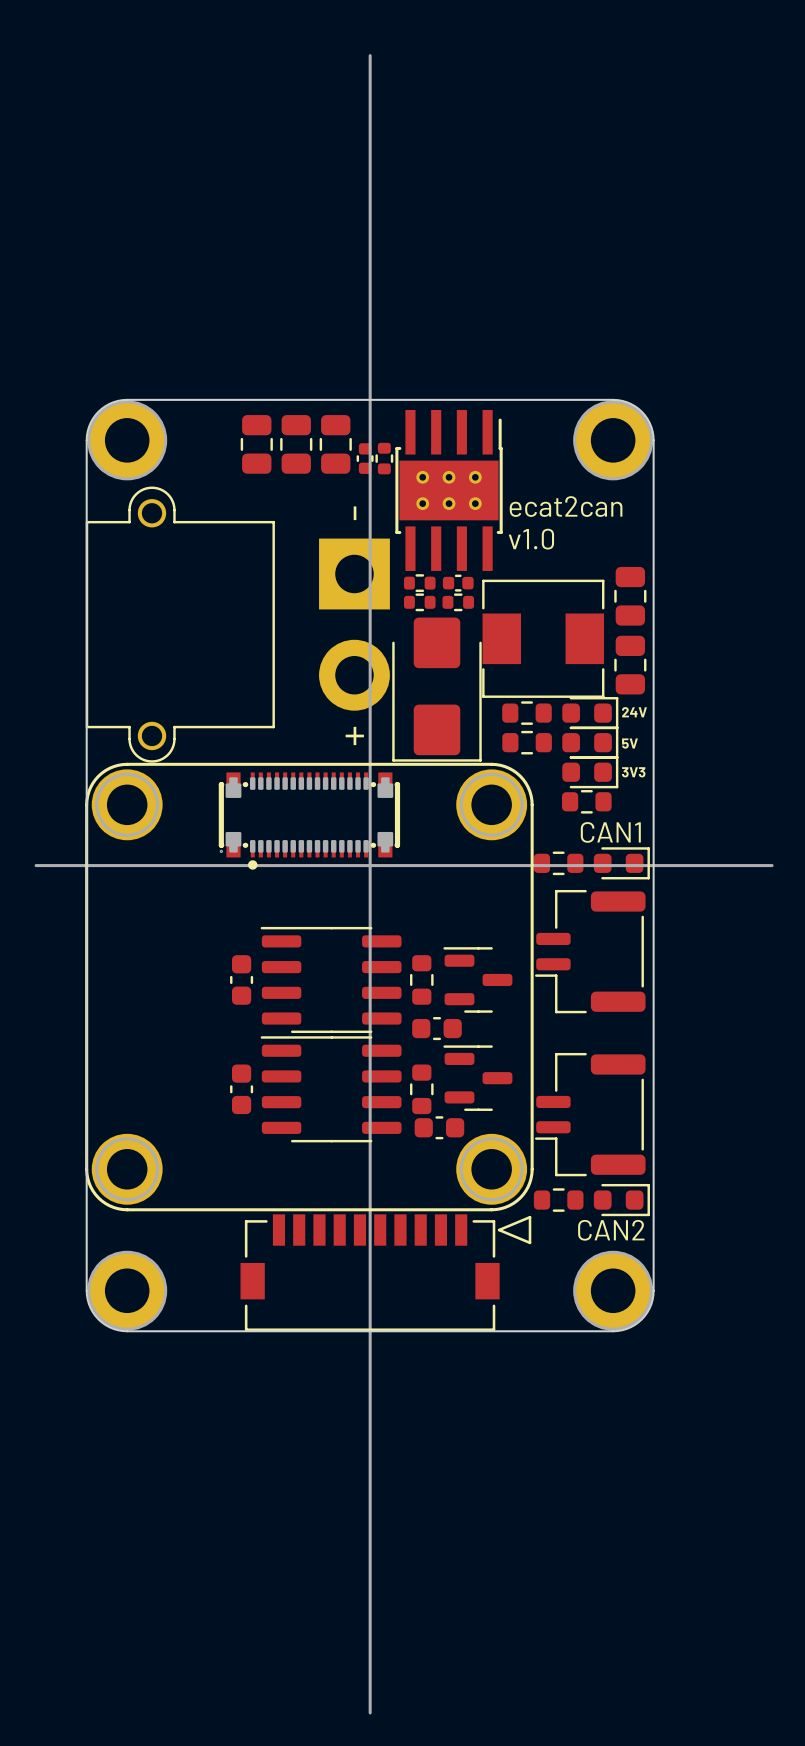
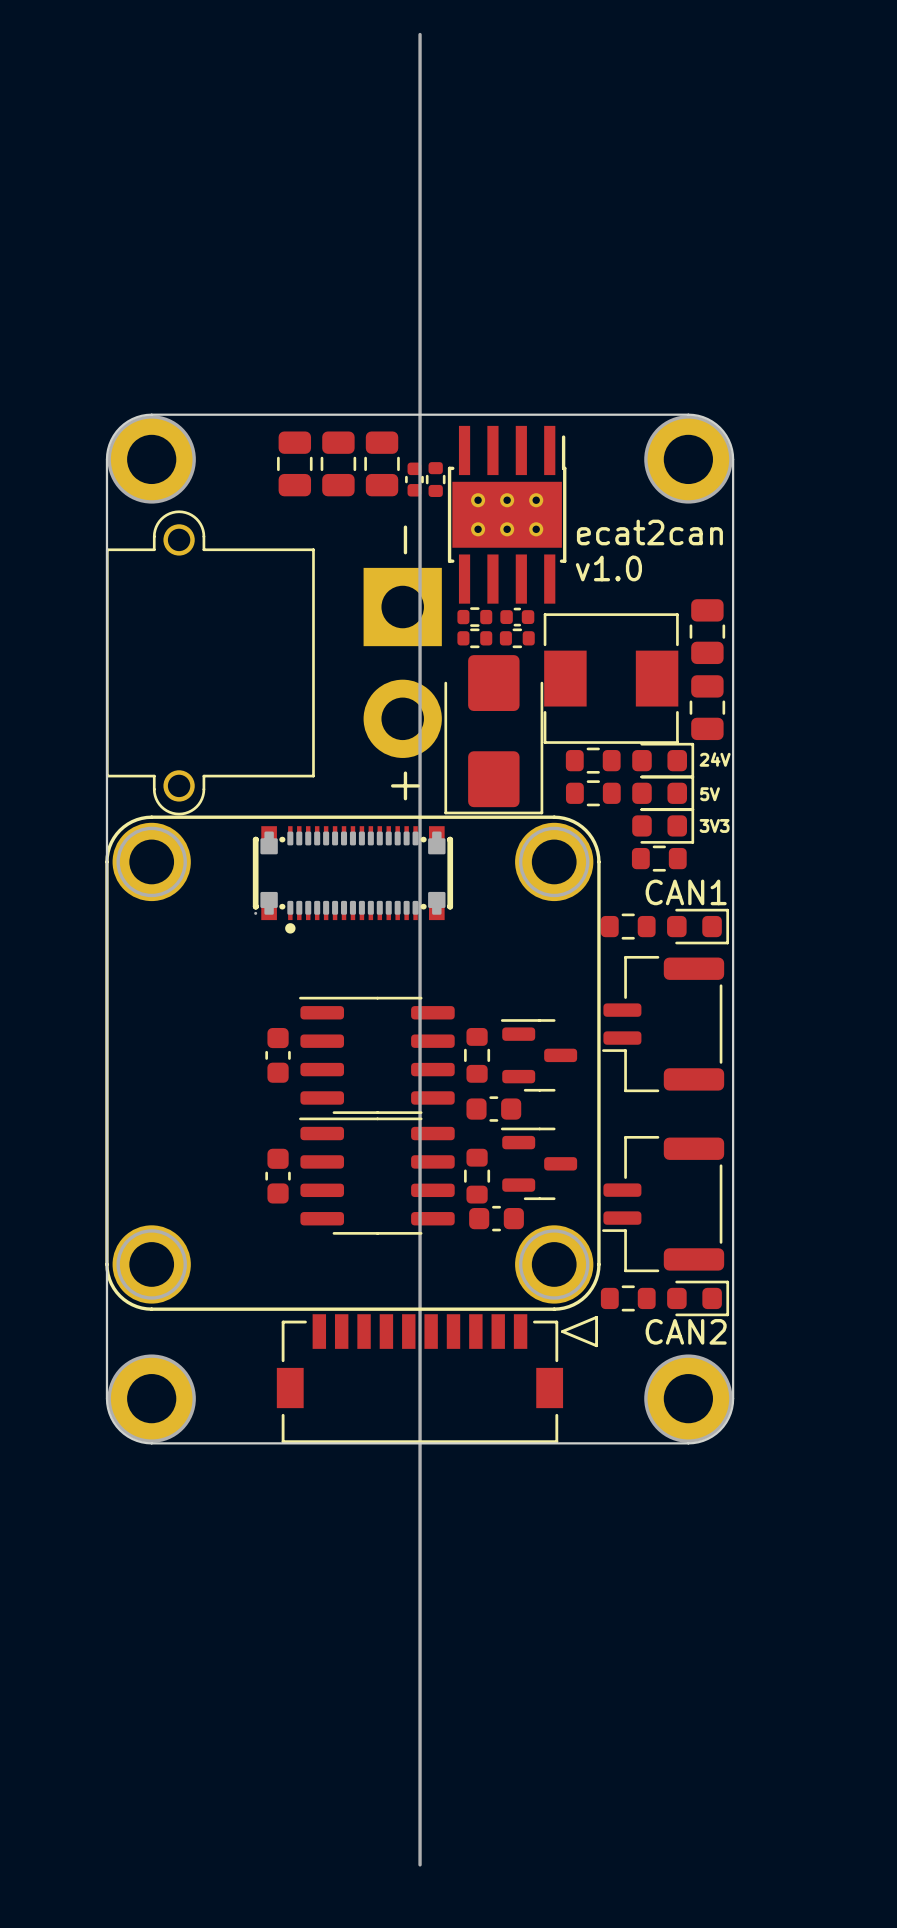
line: (36, 865) (772, 865) -> none

